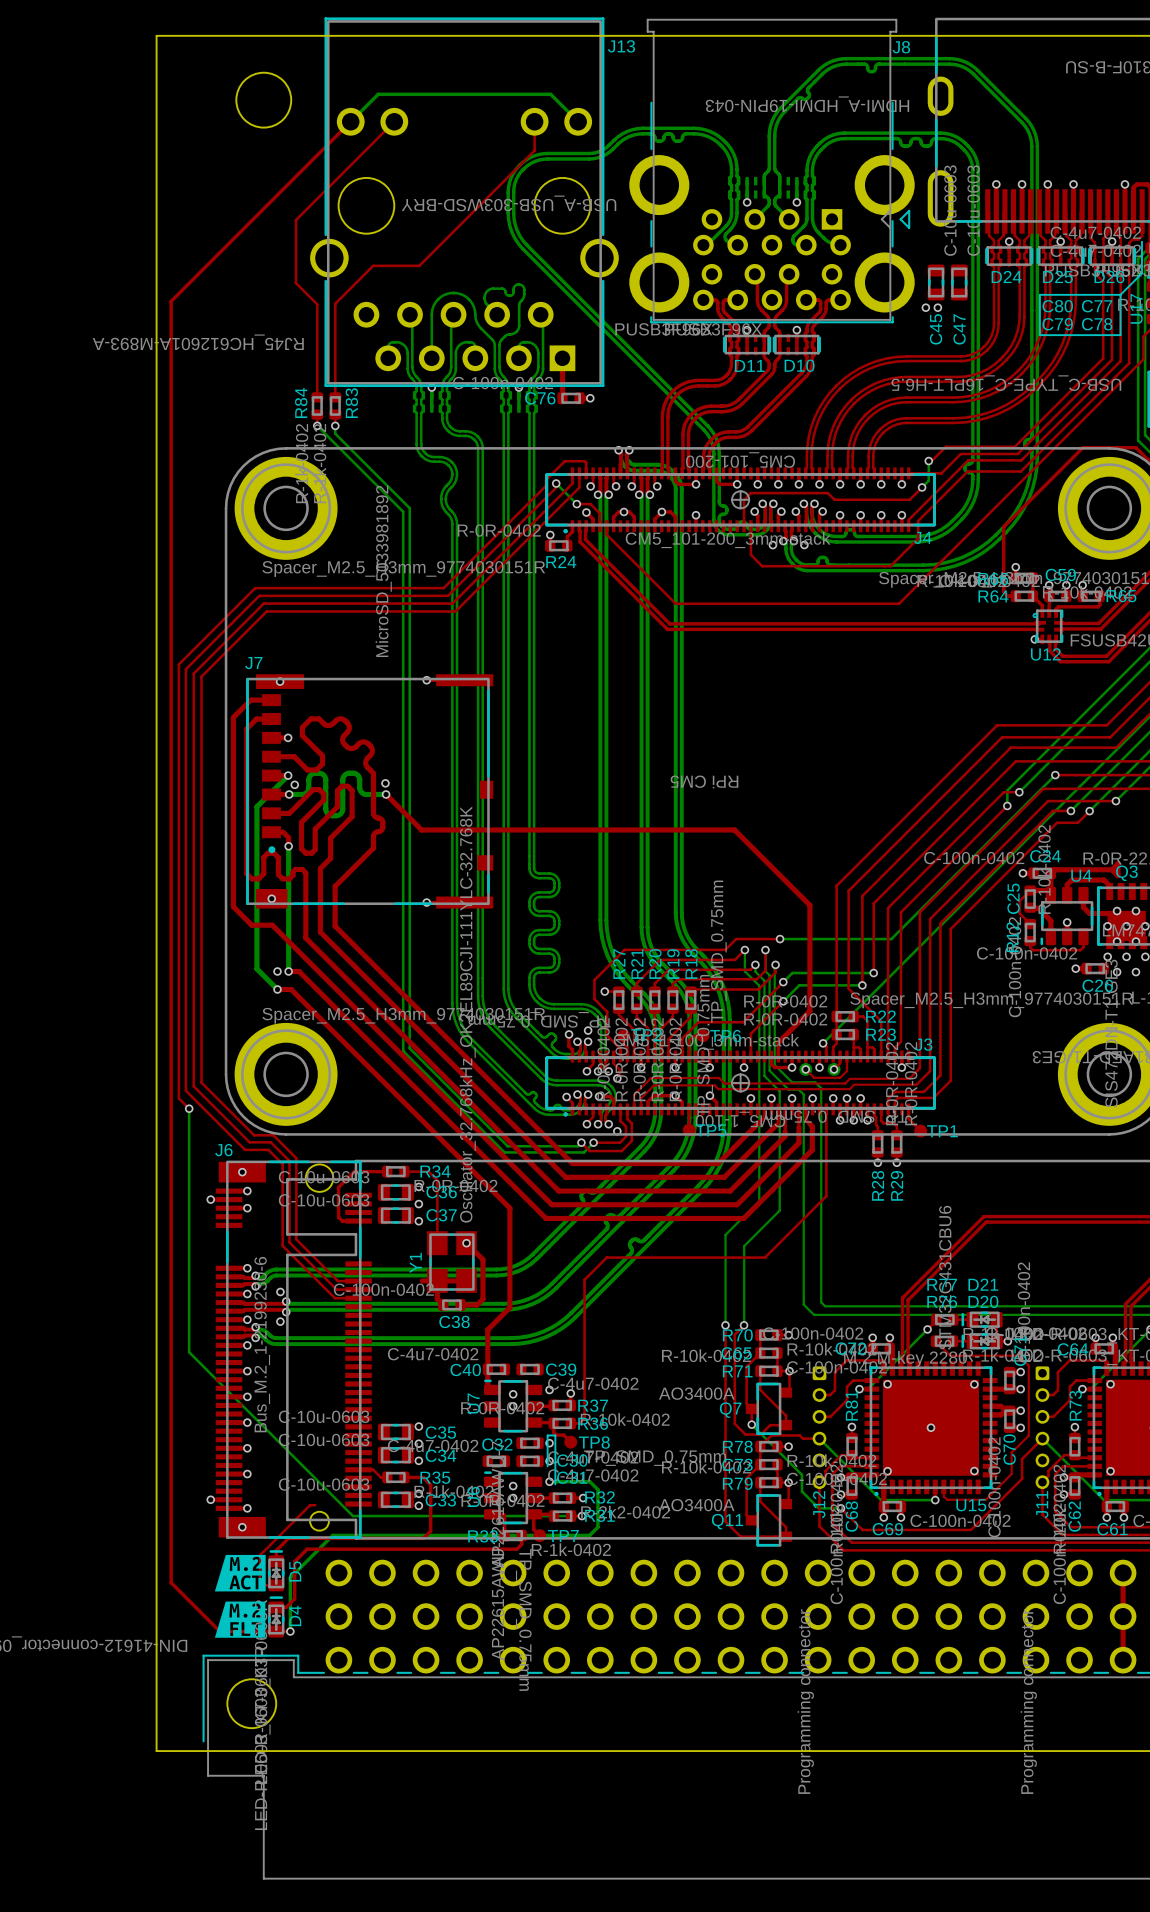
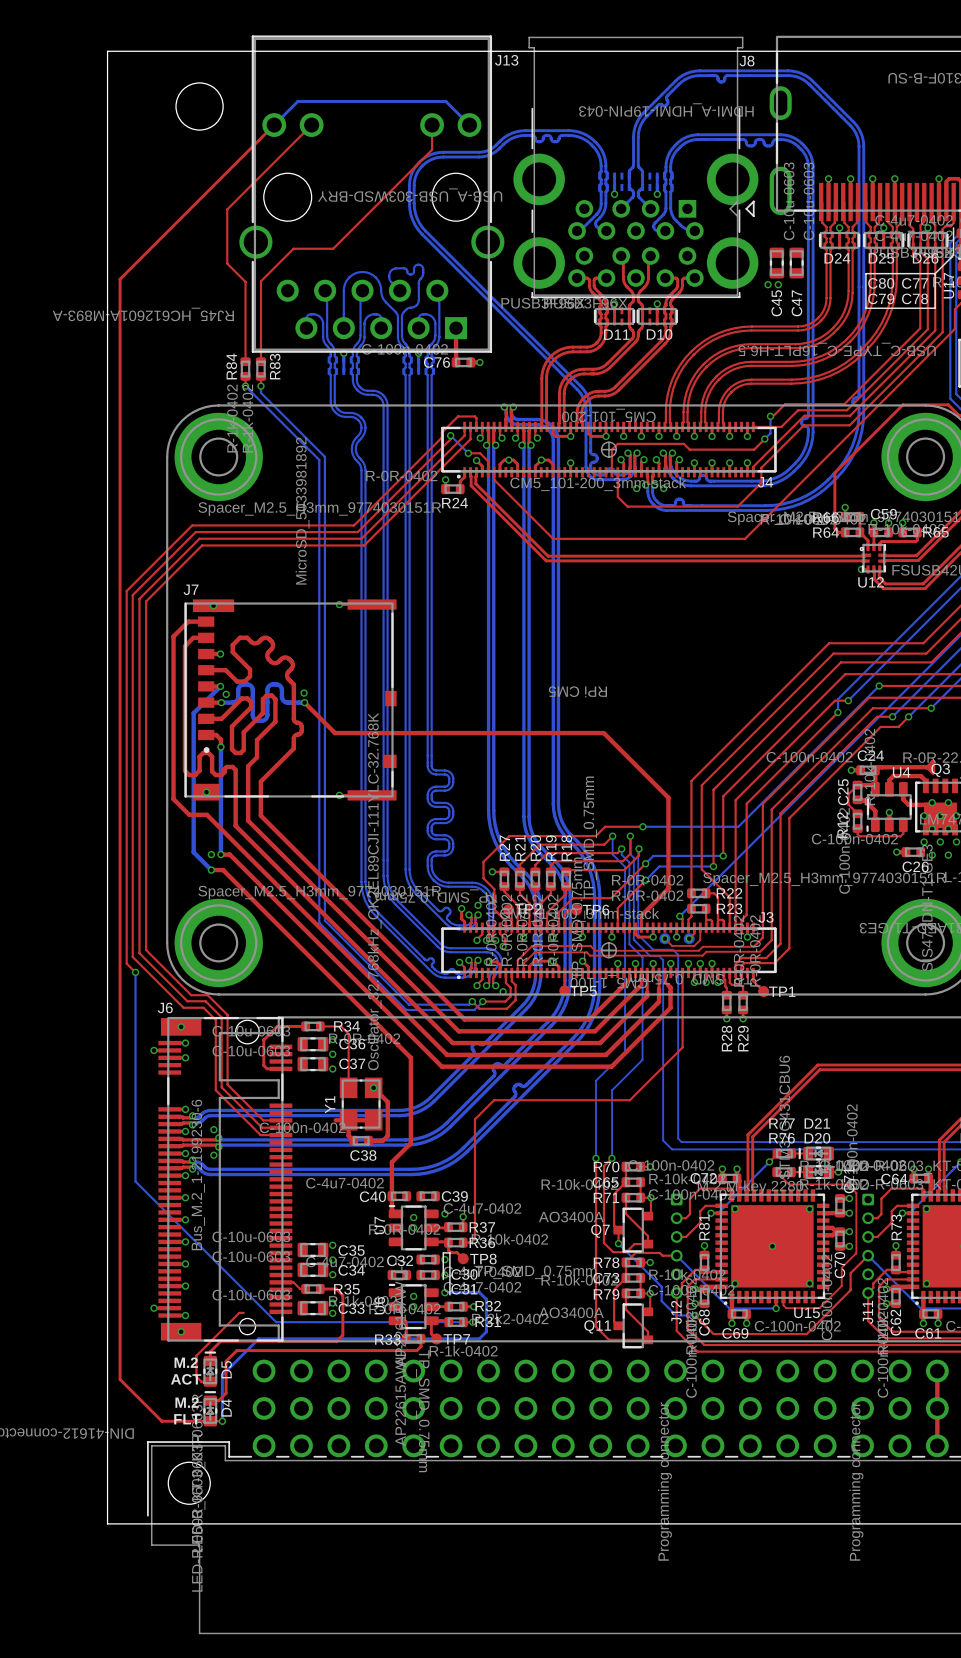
drawing: [214, 1554, 266, 1638] -> none
text: none -> M.2 (186, 1362)
text: none -> ACT (186, 1379)
text: none -> M.2 (187, 1402)
text: none -> FLT (187, 1419)

